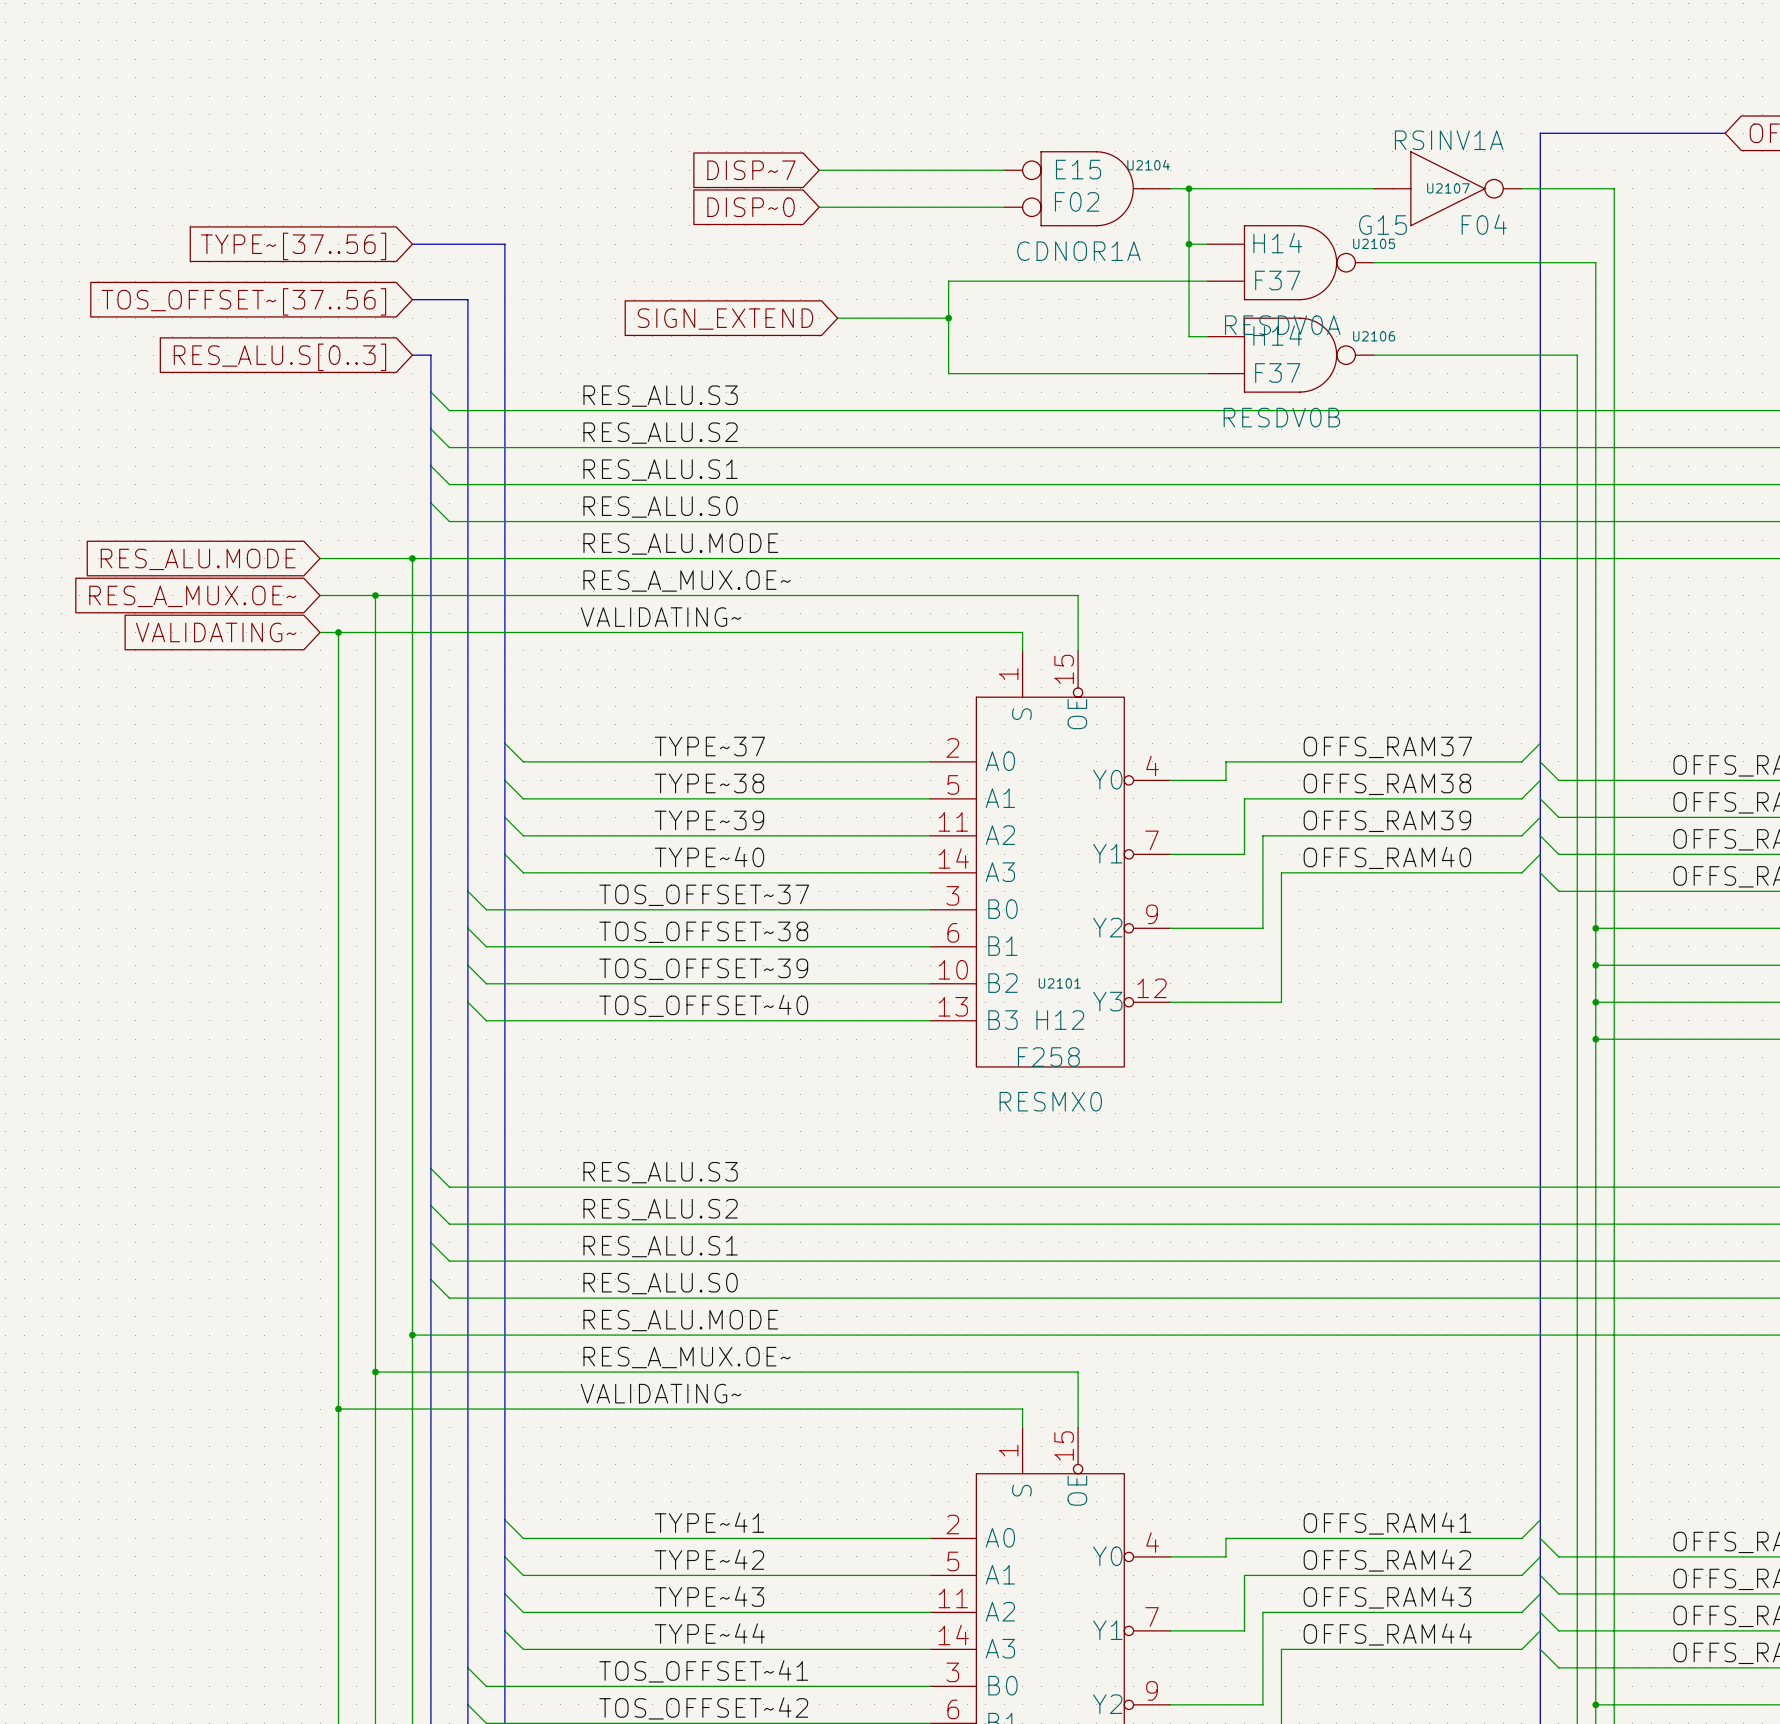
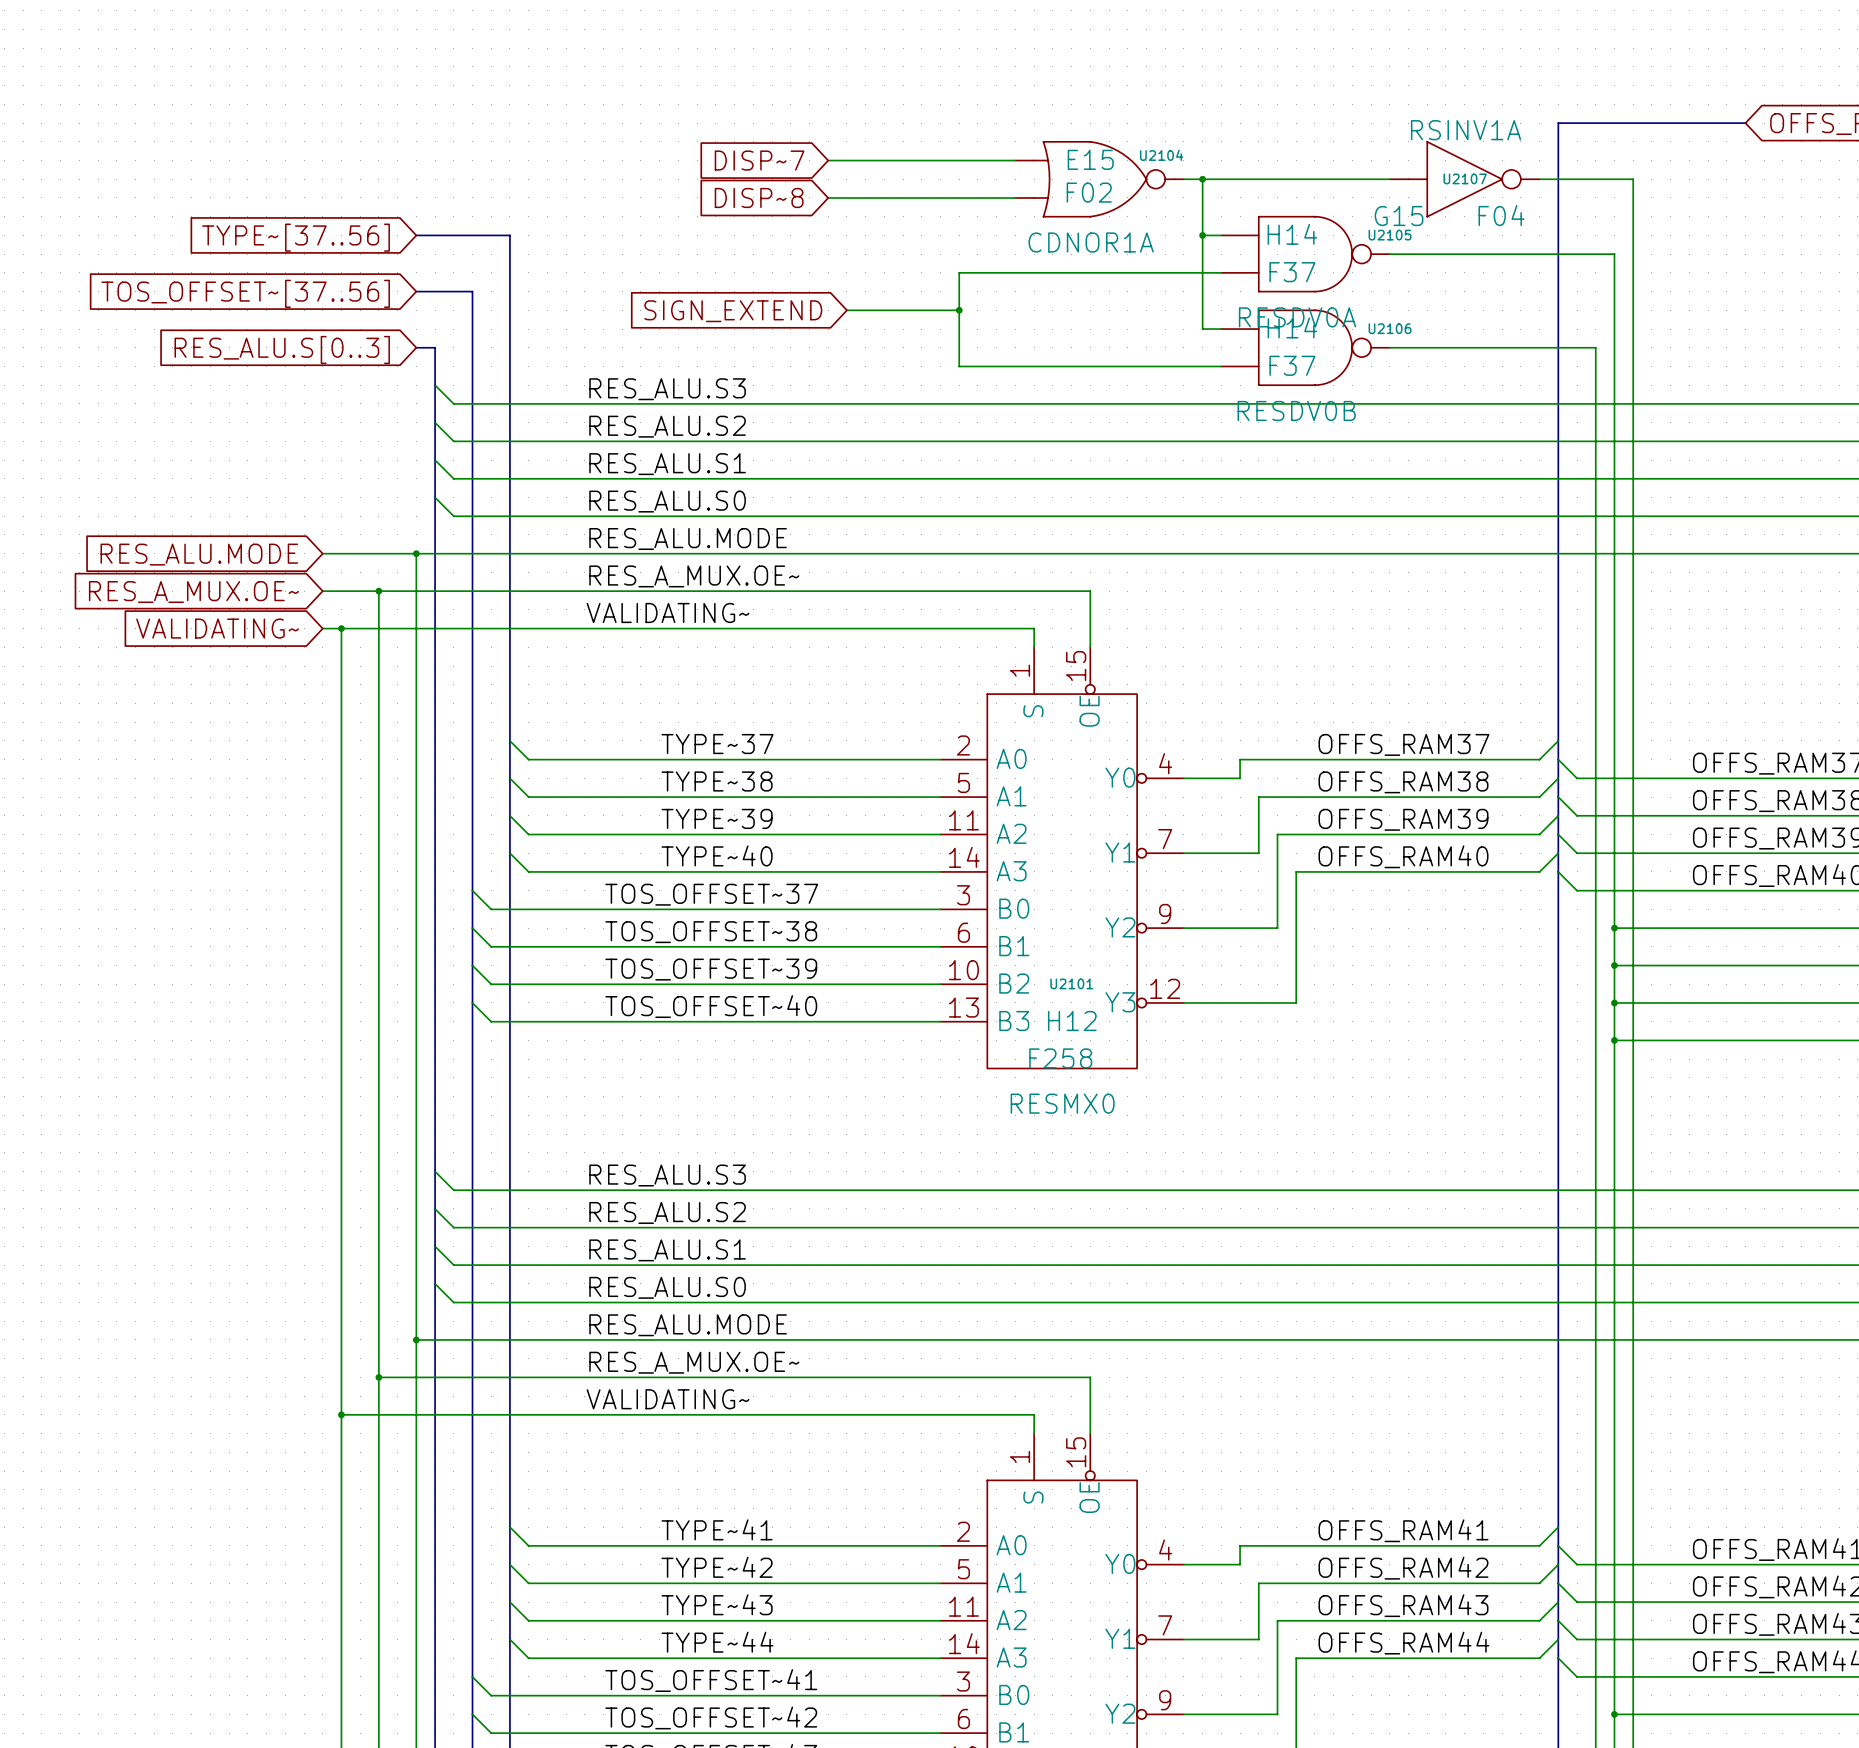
U2104 symbol: [1004, 151, 1171, 227] -> [1015, 141, 1184, 218]
global label: DISP~0 (751, 207) -> DISP~8 (759, 197)

